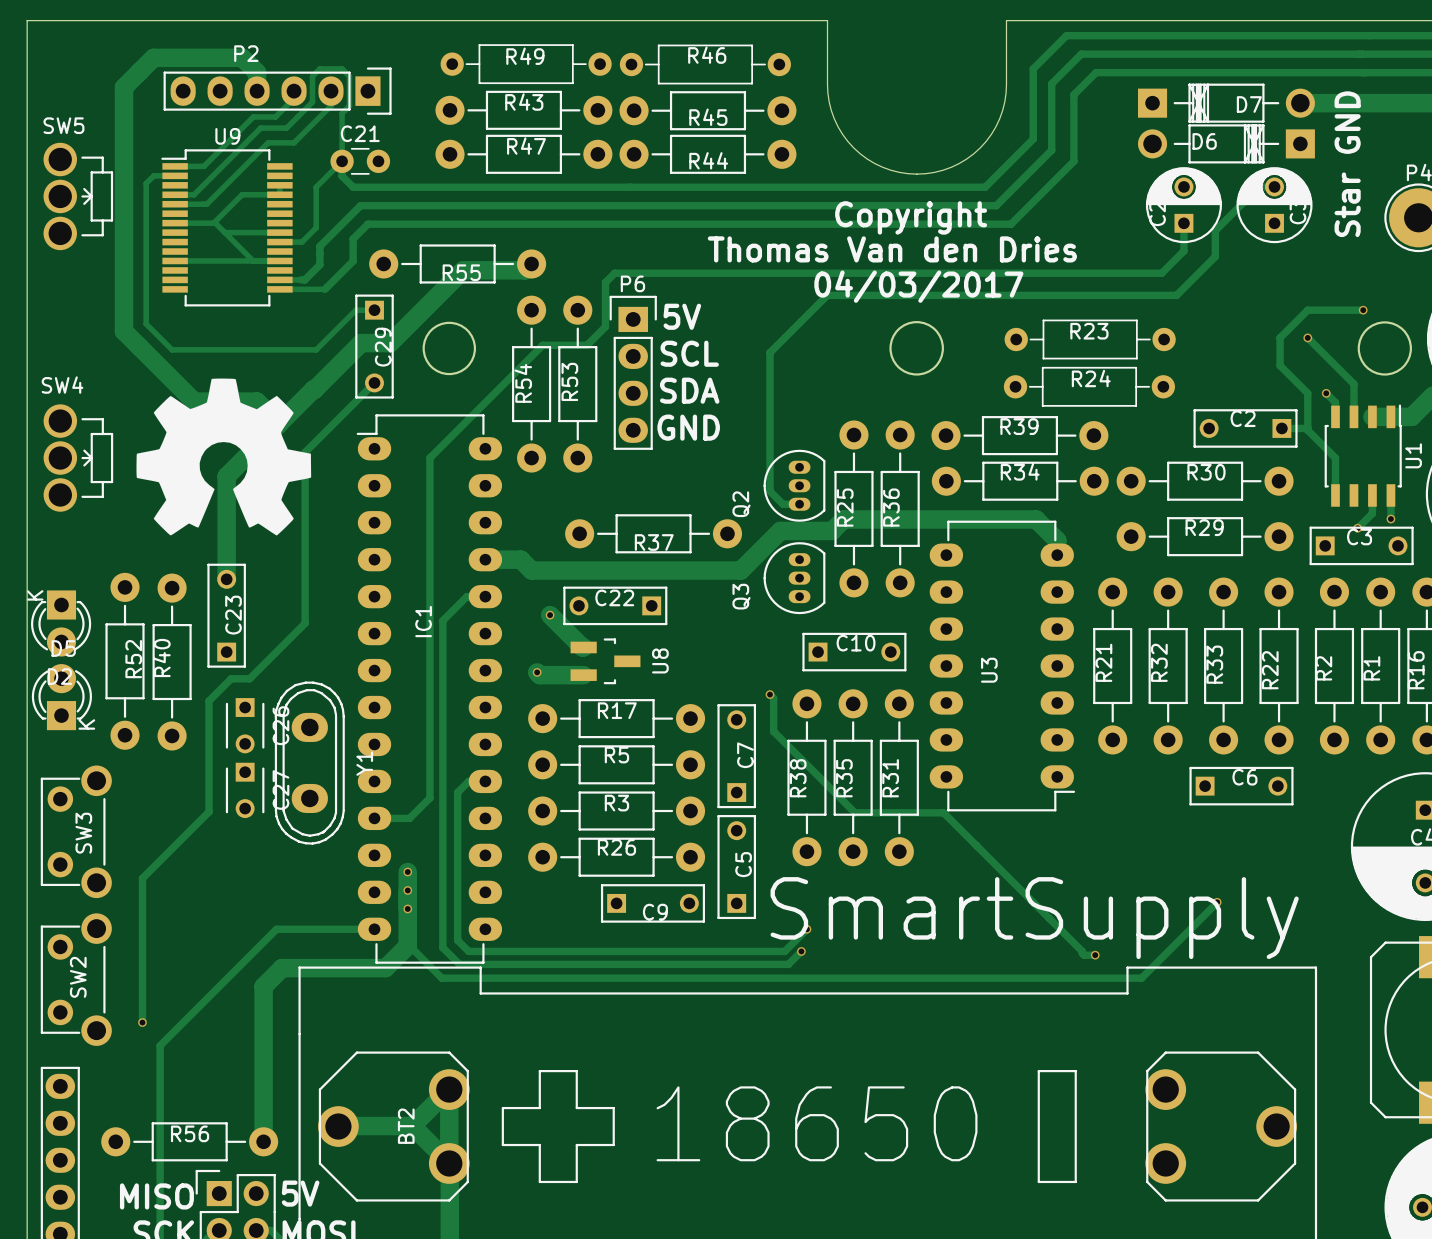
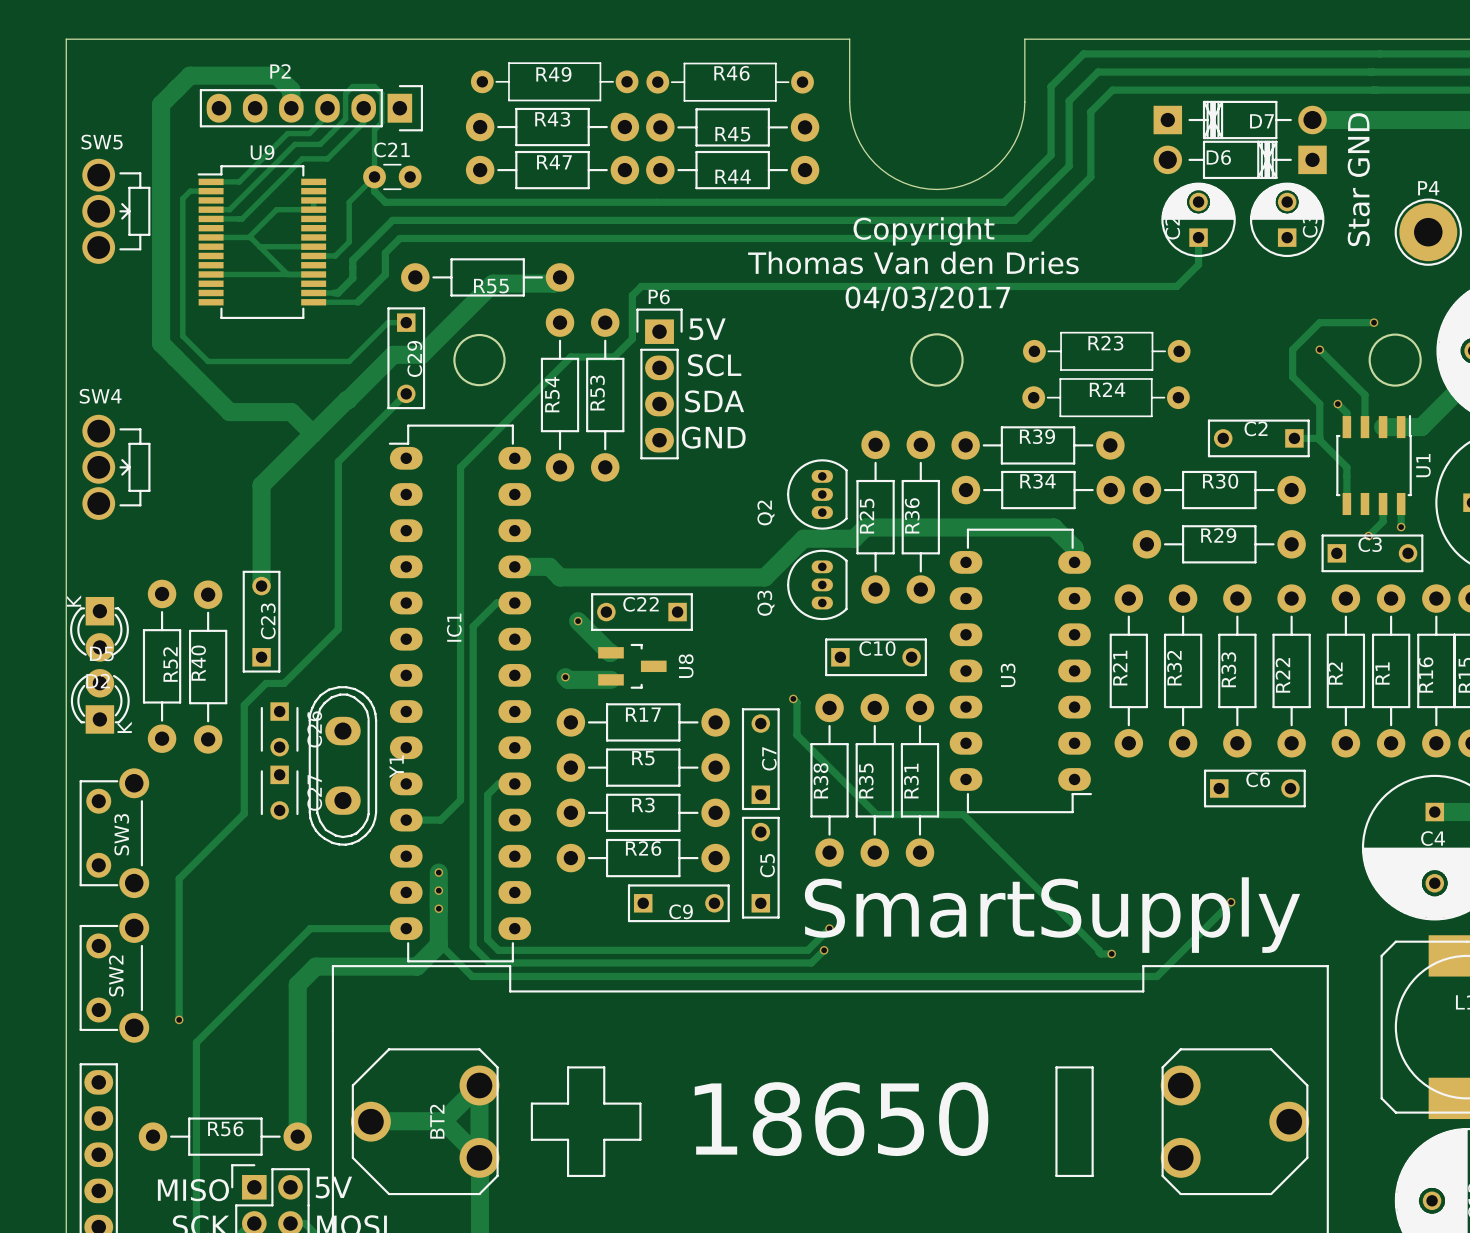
track: (1274, 186) (1259, 186) (1215, 230) (1215, 256) (1176, 295) (827, 295) (769, 352) (769, 491) (782, 504) (799, 504) -> none
drawing: [136, 378, 312, 536] -> none
R37: (653, 533) -> none

